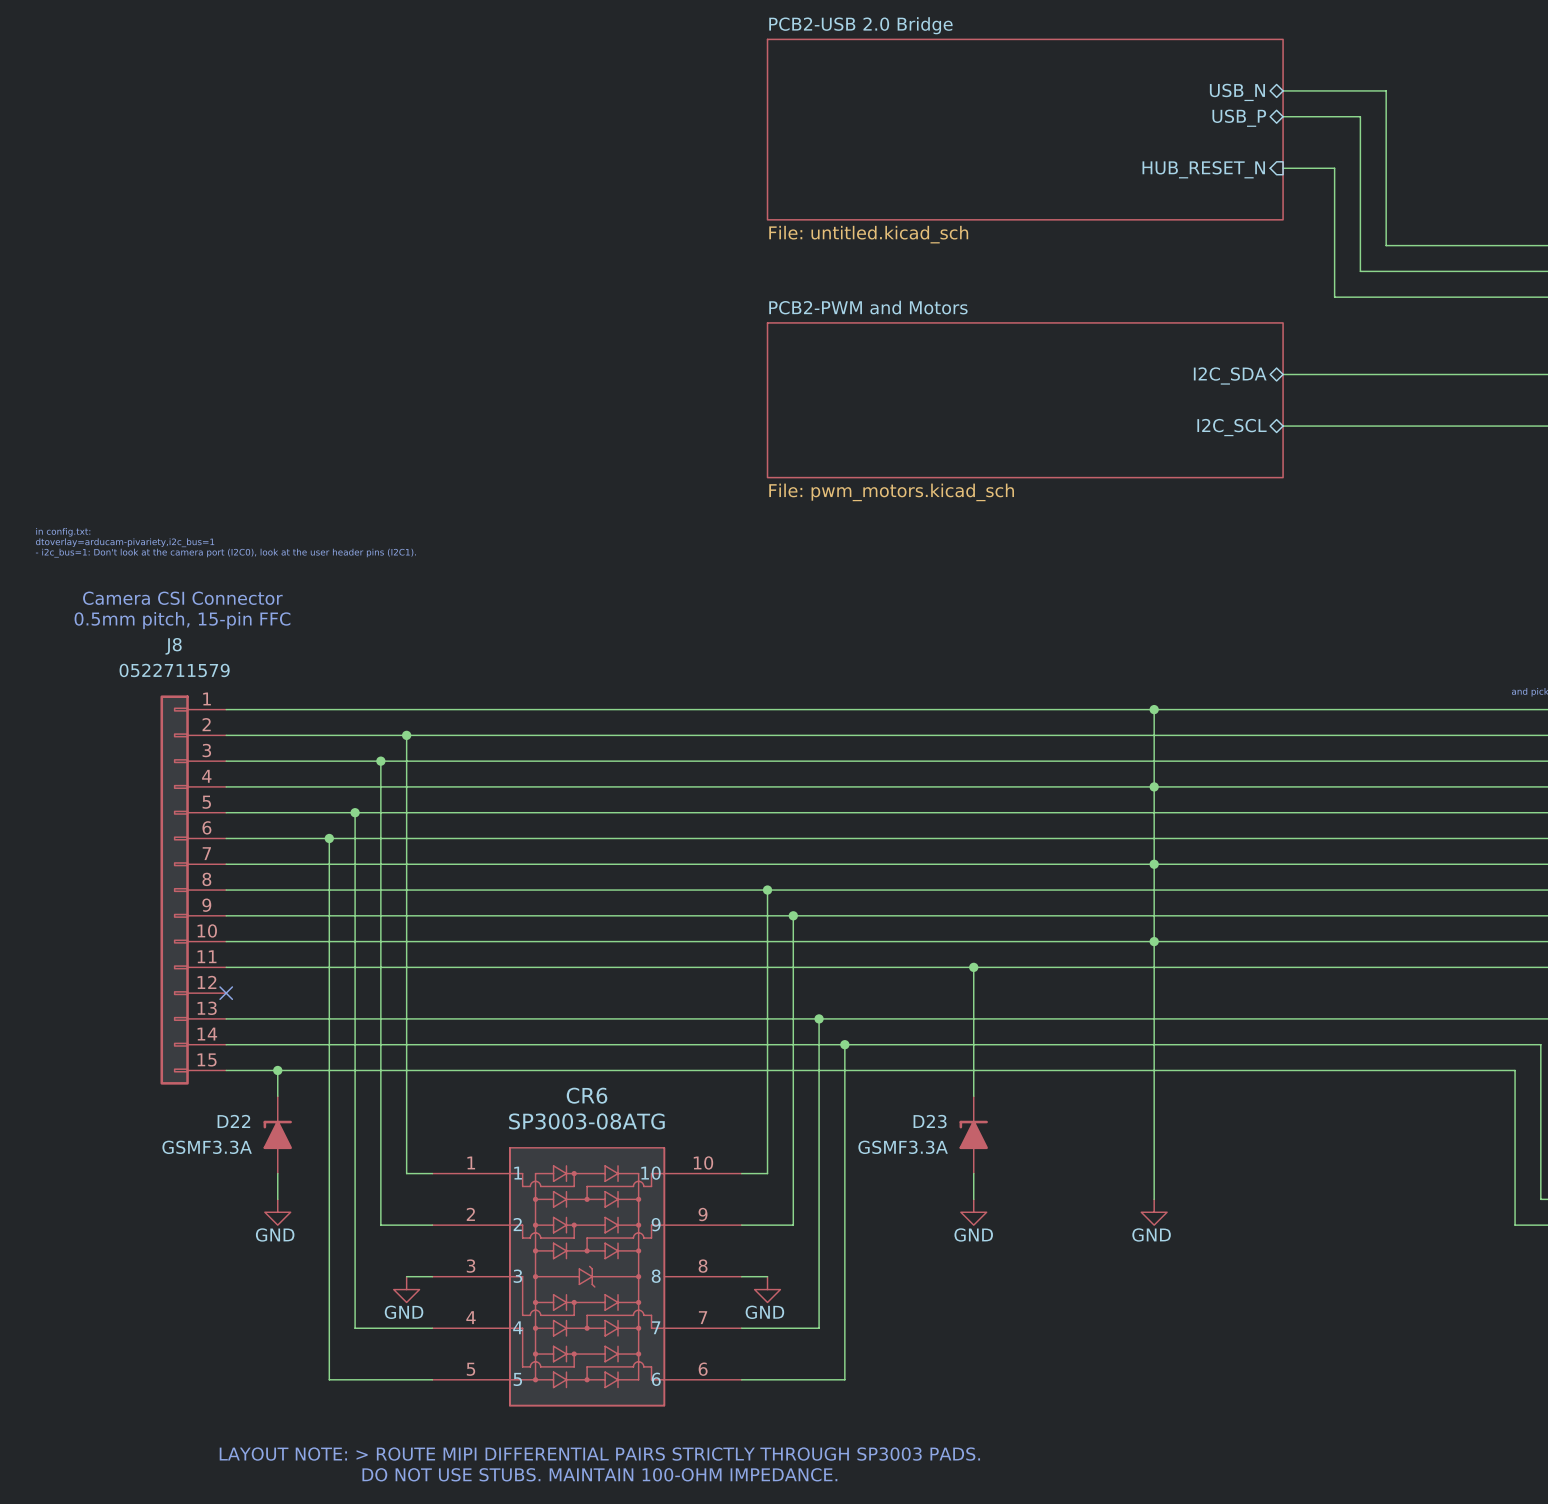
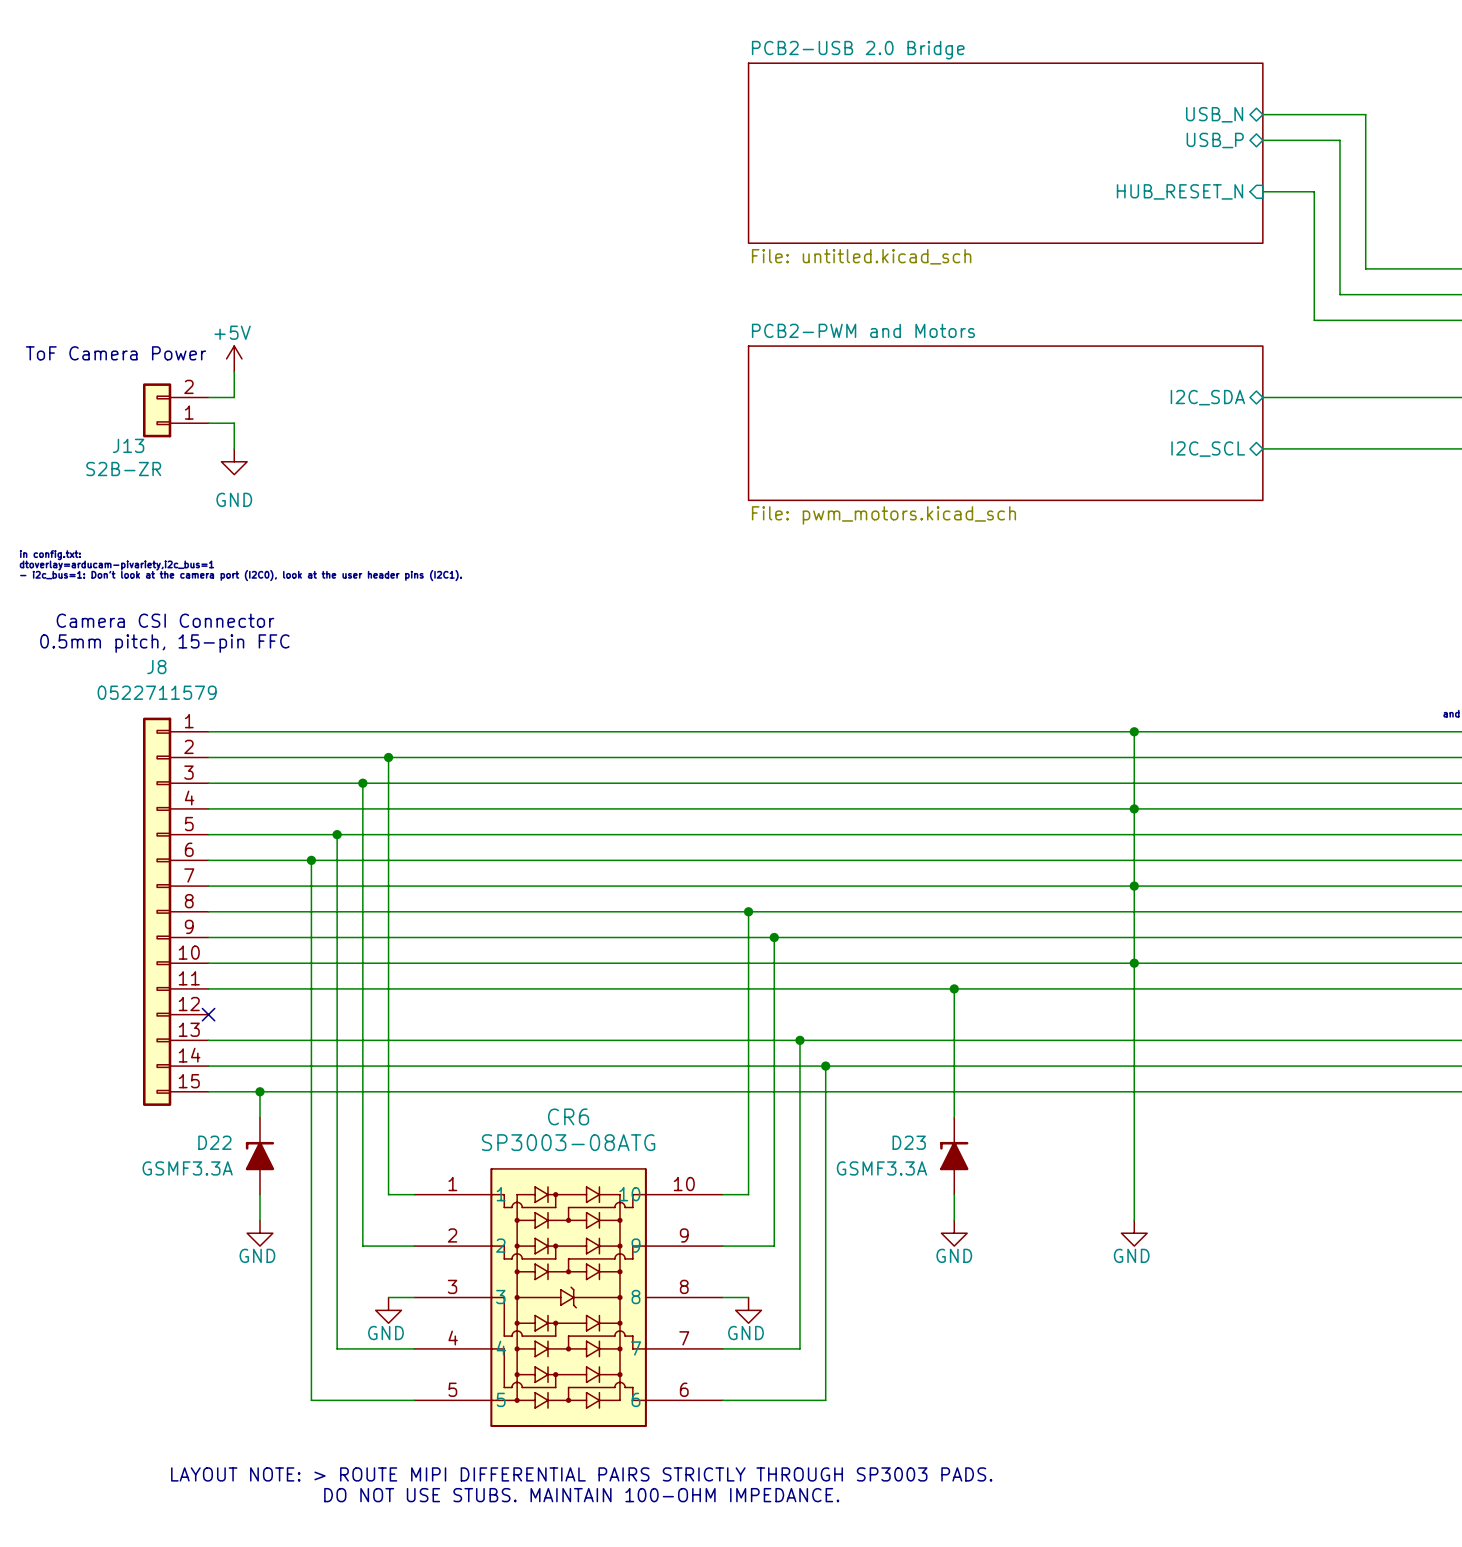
text: none -> ToF Camera Power (115, 353)
power symbol: none -> +5V (234, 358)
wire: none -> (234, 371) (234, 397) (208, 397)
J13: none -> S2B-ZR (175, 410)
wire: none -> (208, 423) (234, 423) (234, 448)
power symbol: none -> GND (234, 461)

